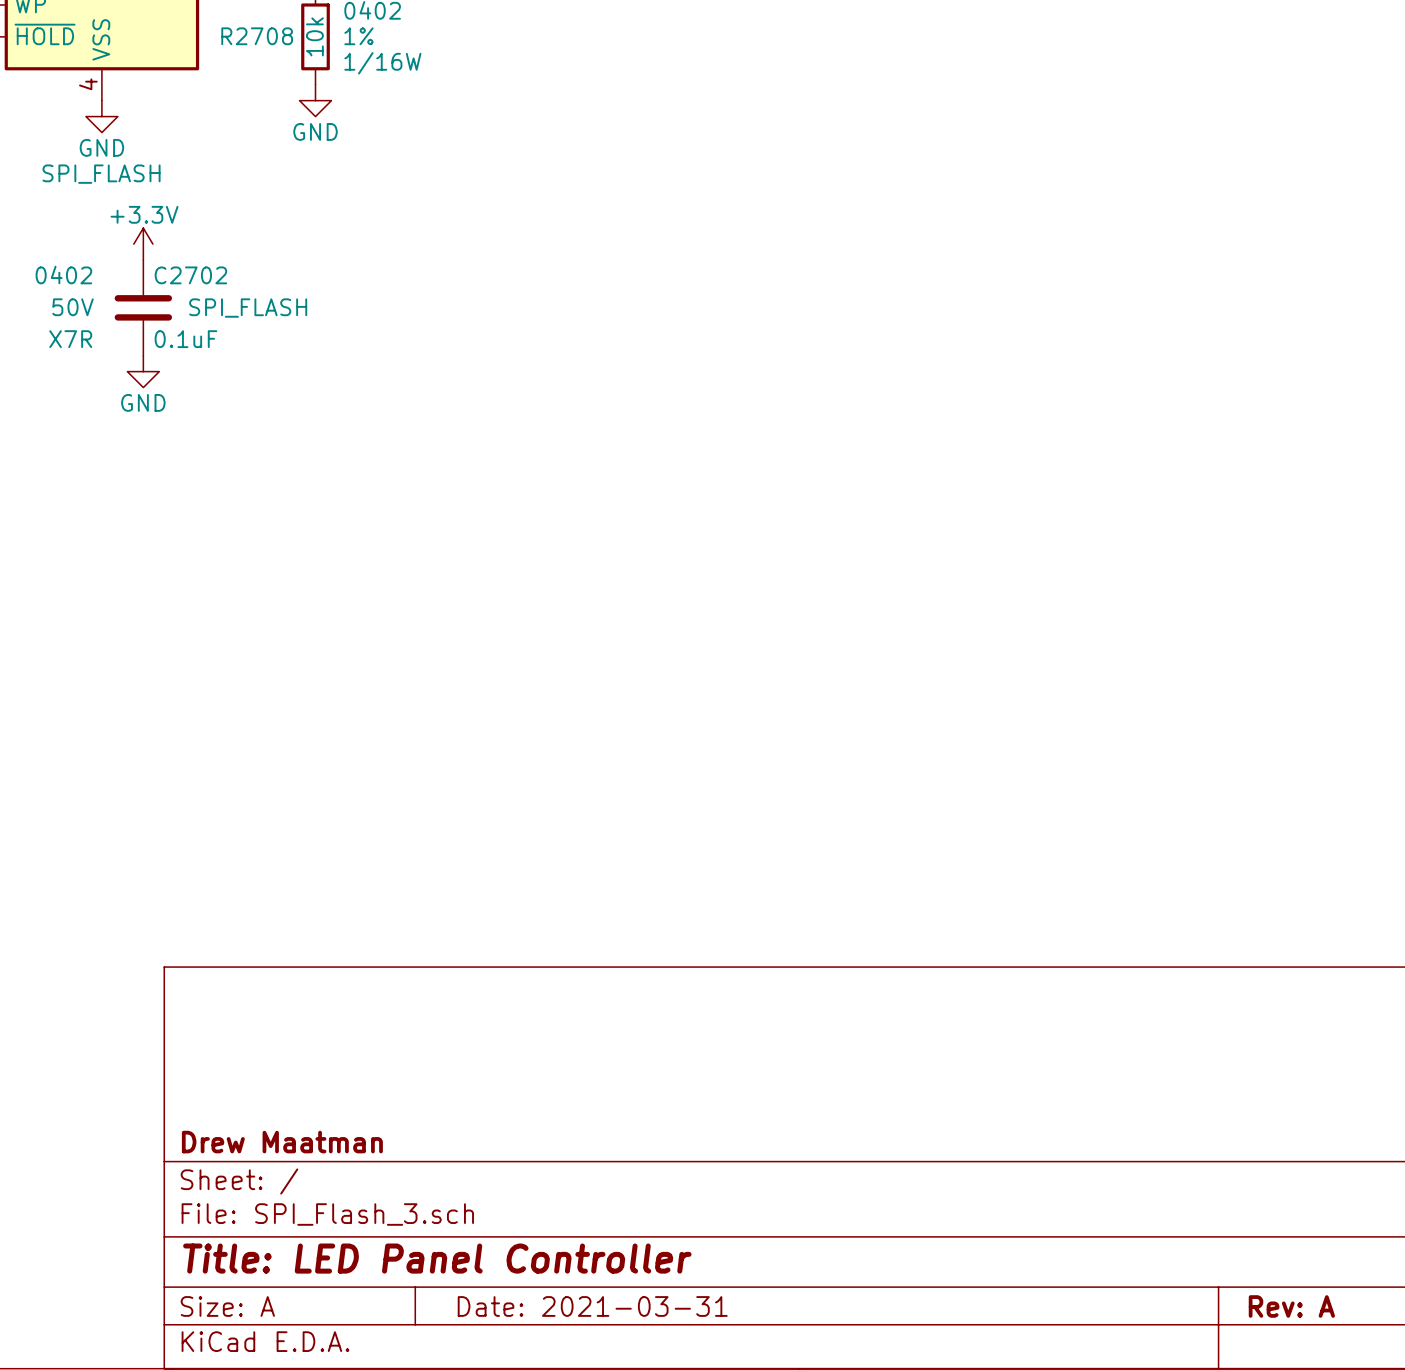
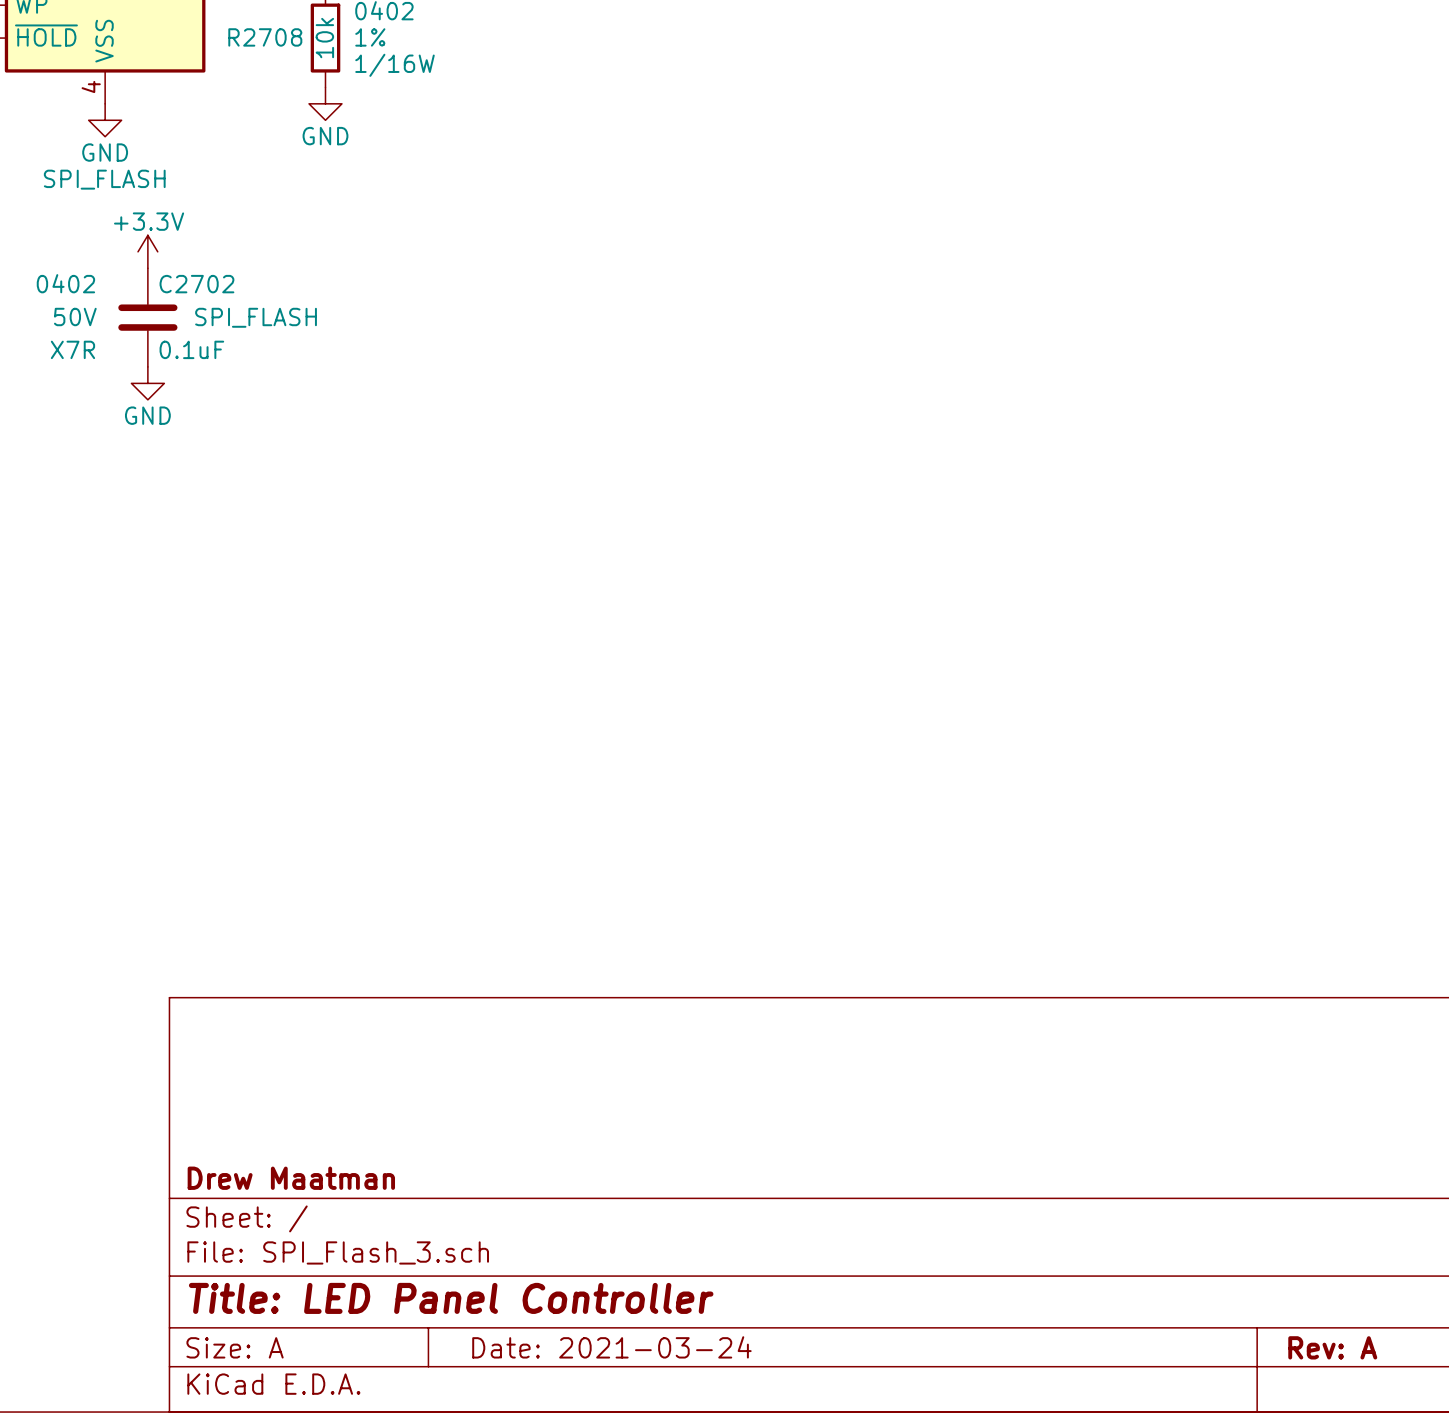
title block: Date: 2021-03-31 (592, 1306) -> Date: 2021-03-24 (611, 1347)

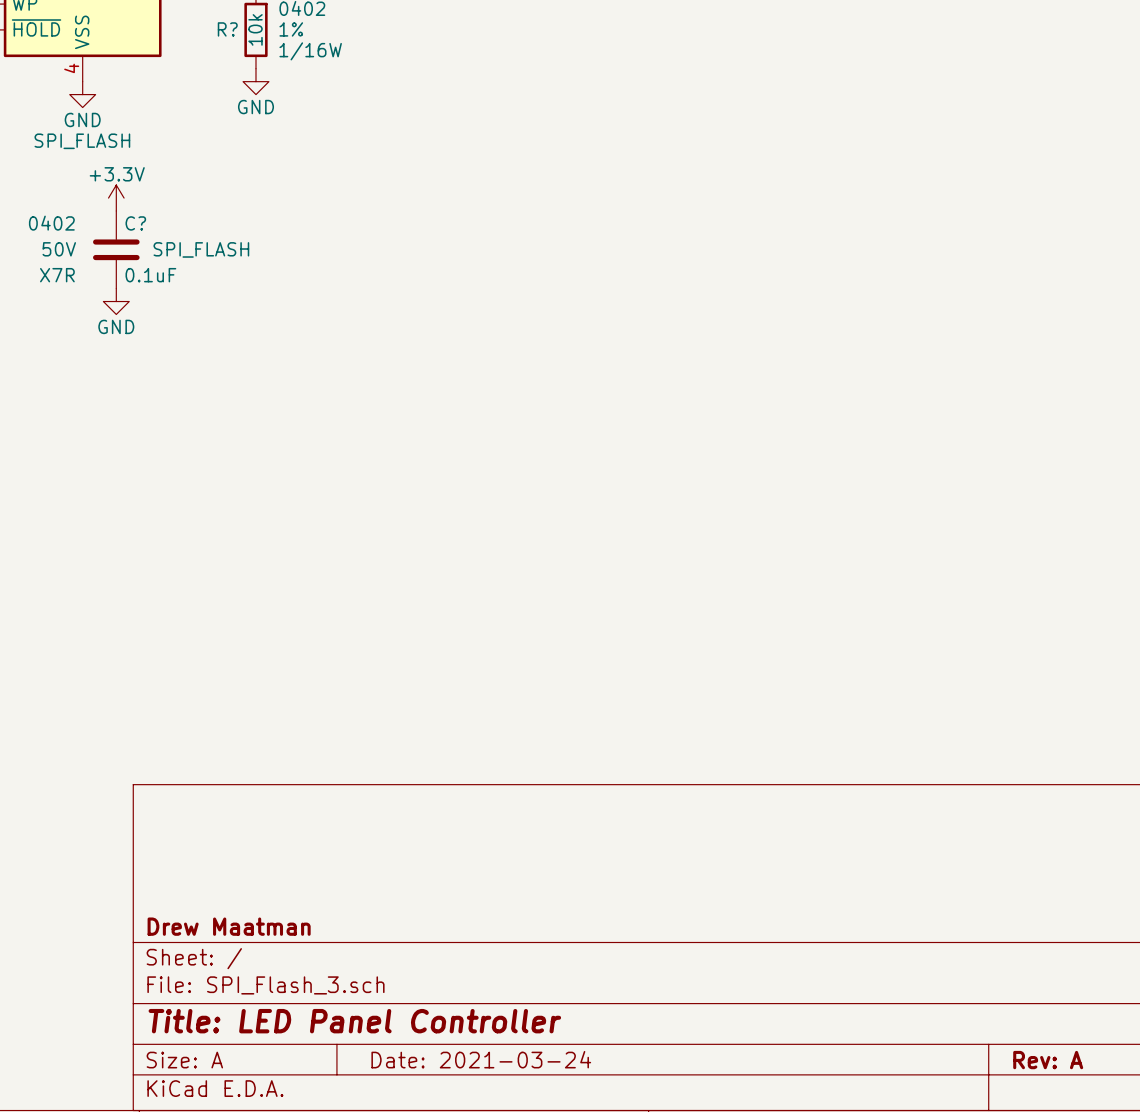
R2708 name: R2708 (265, 37) -> R? (227, 29)
C2702 name: C2702 (196, 284) -> C? (135, 223)

